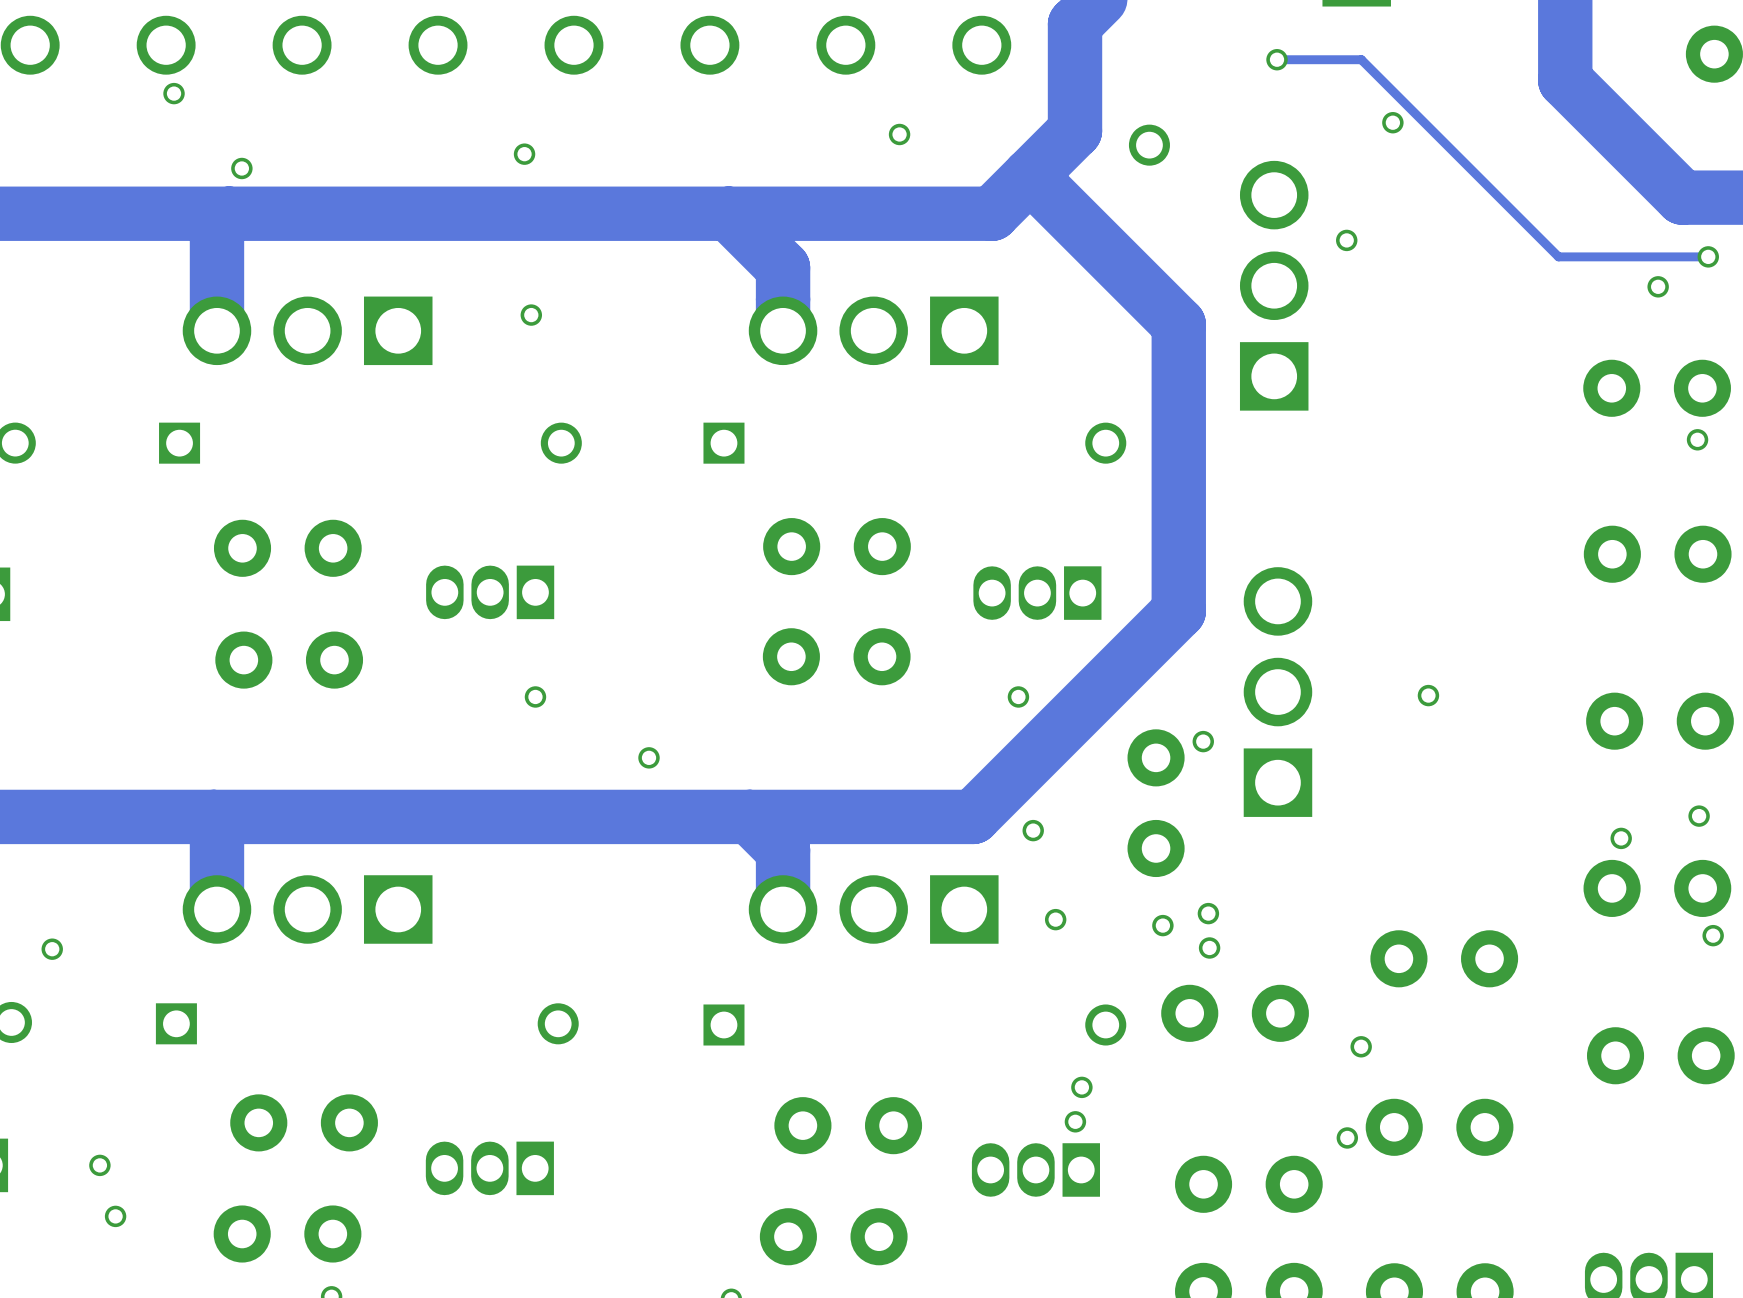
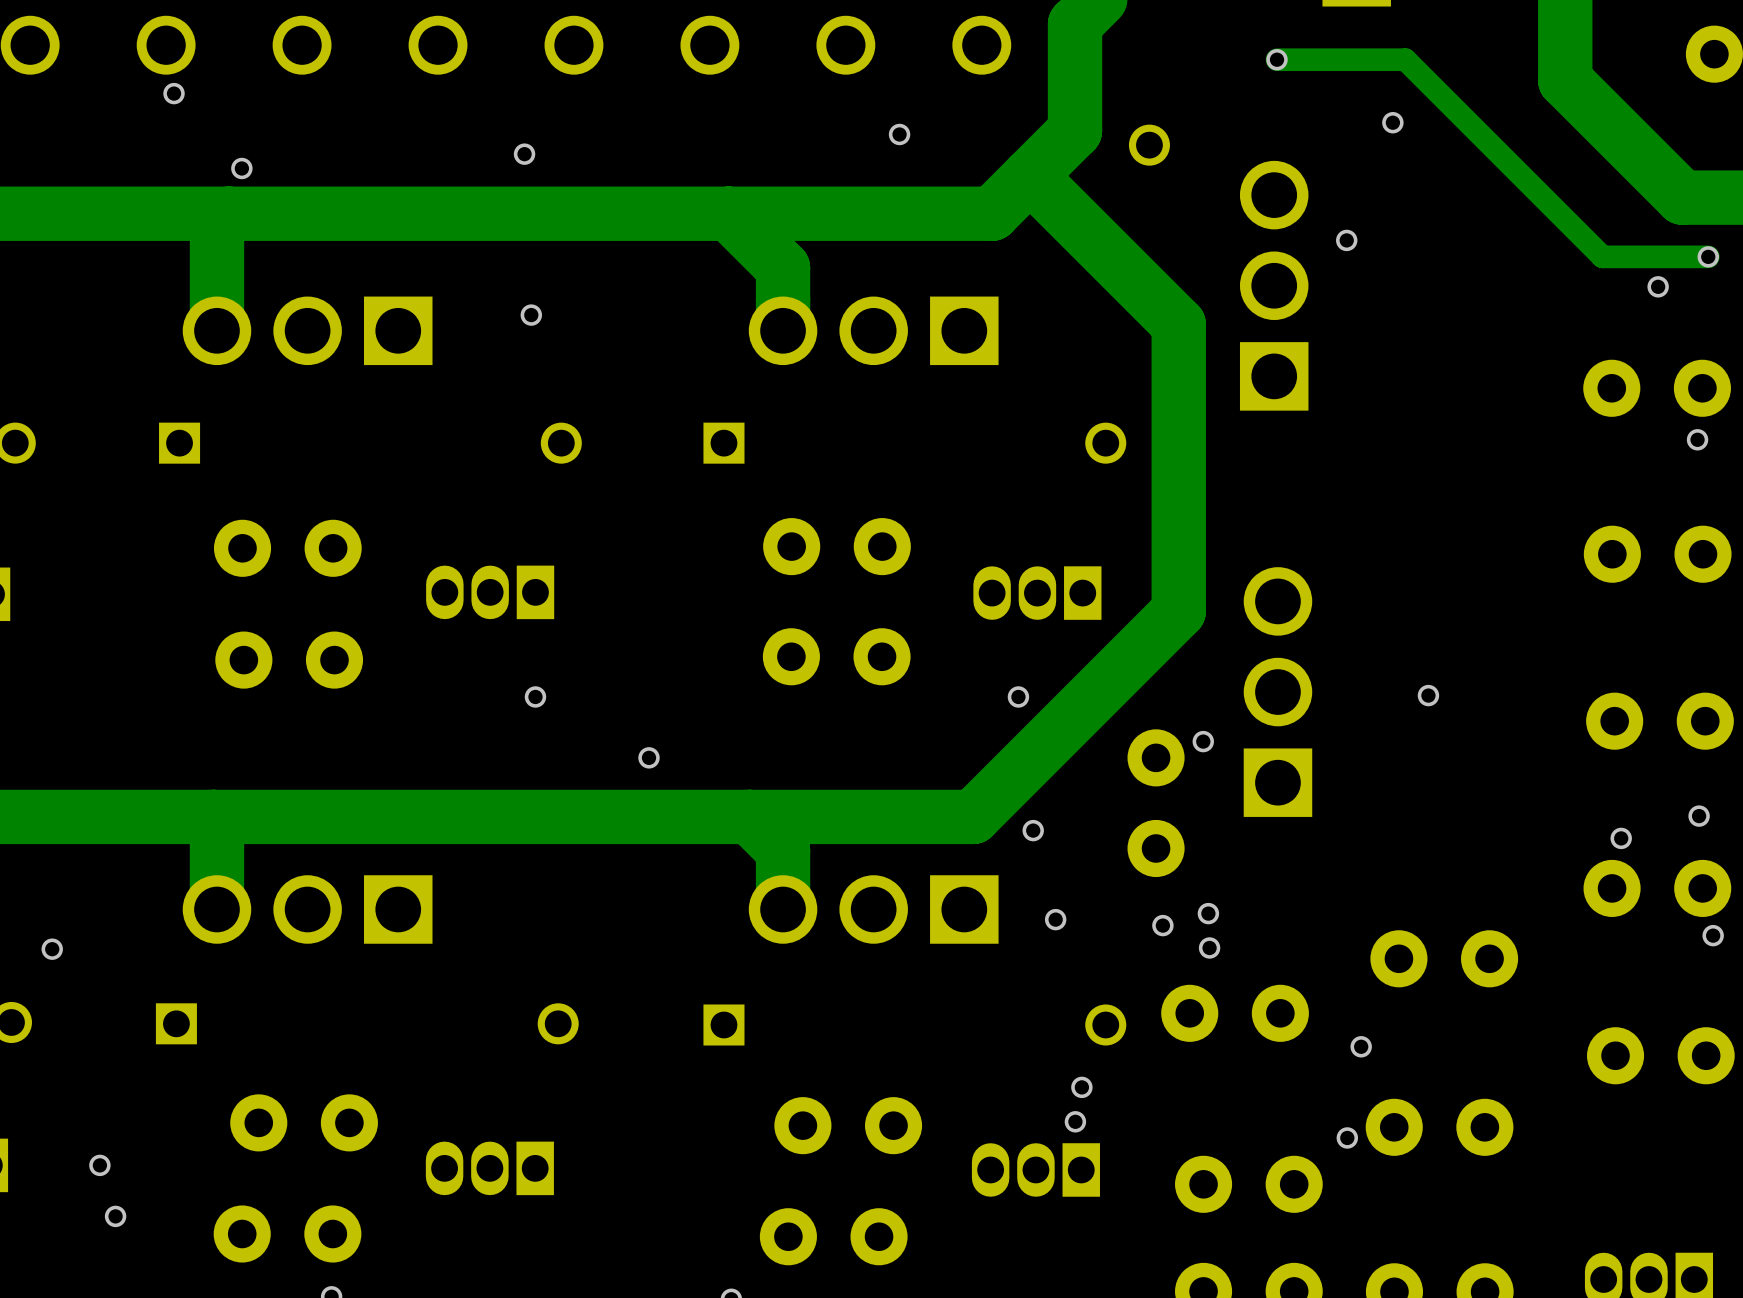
track: (1361, 59) (1558, 256) (1602, 256) -> (1361, 59) (1405, 59) (1602, 256)
track width: thin (1361, 59) (1277, 59) -> thick (1361, 59) (1277, 59)
track width: thin (1708, 256) (1602, 256) -> thick (1708, 256) (1602, 256)

